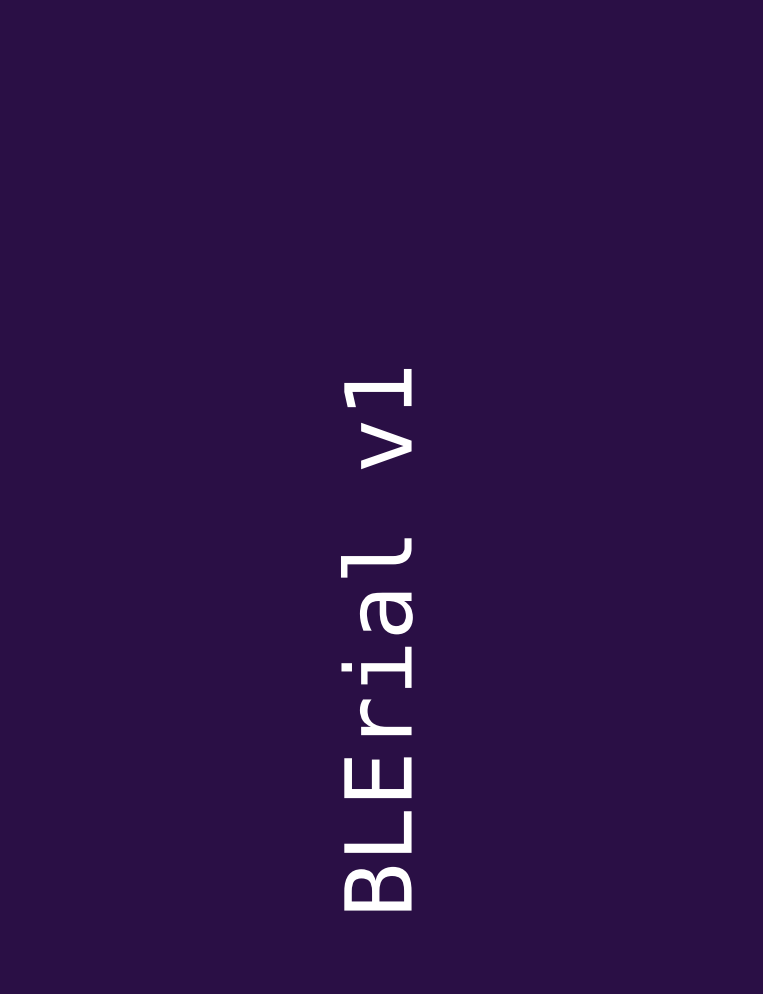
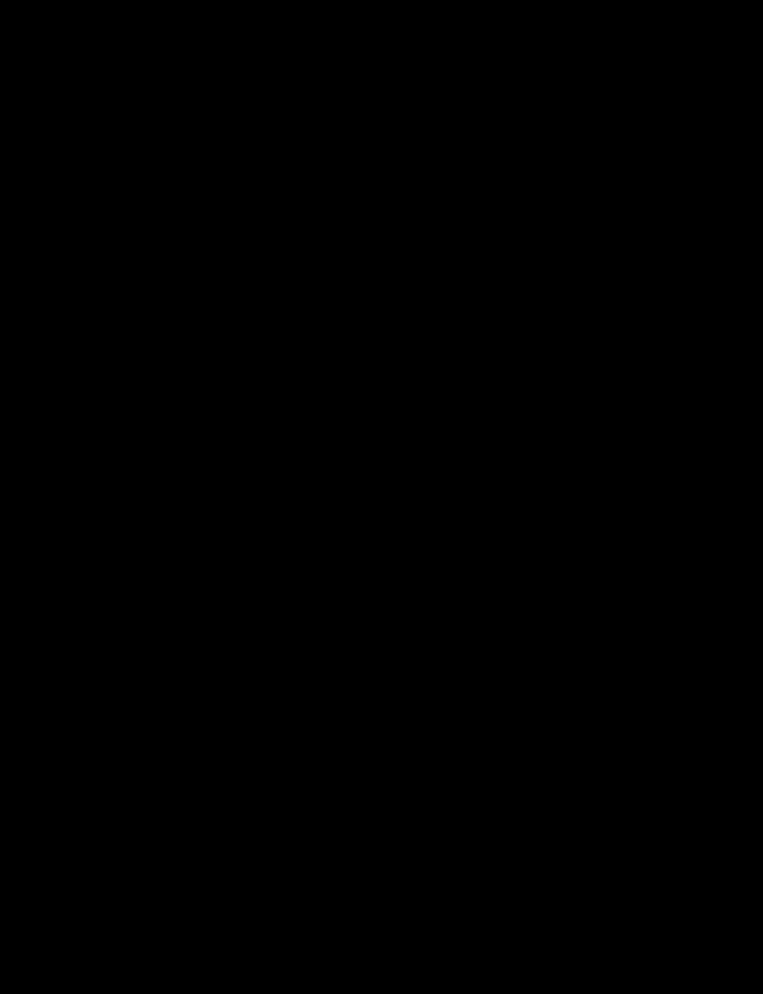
text: BLErial v1 (376, 639) -> none

